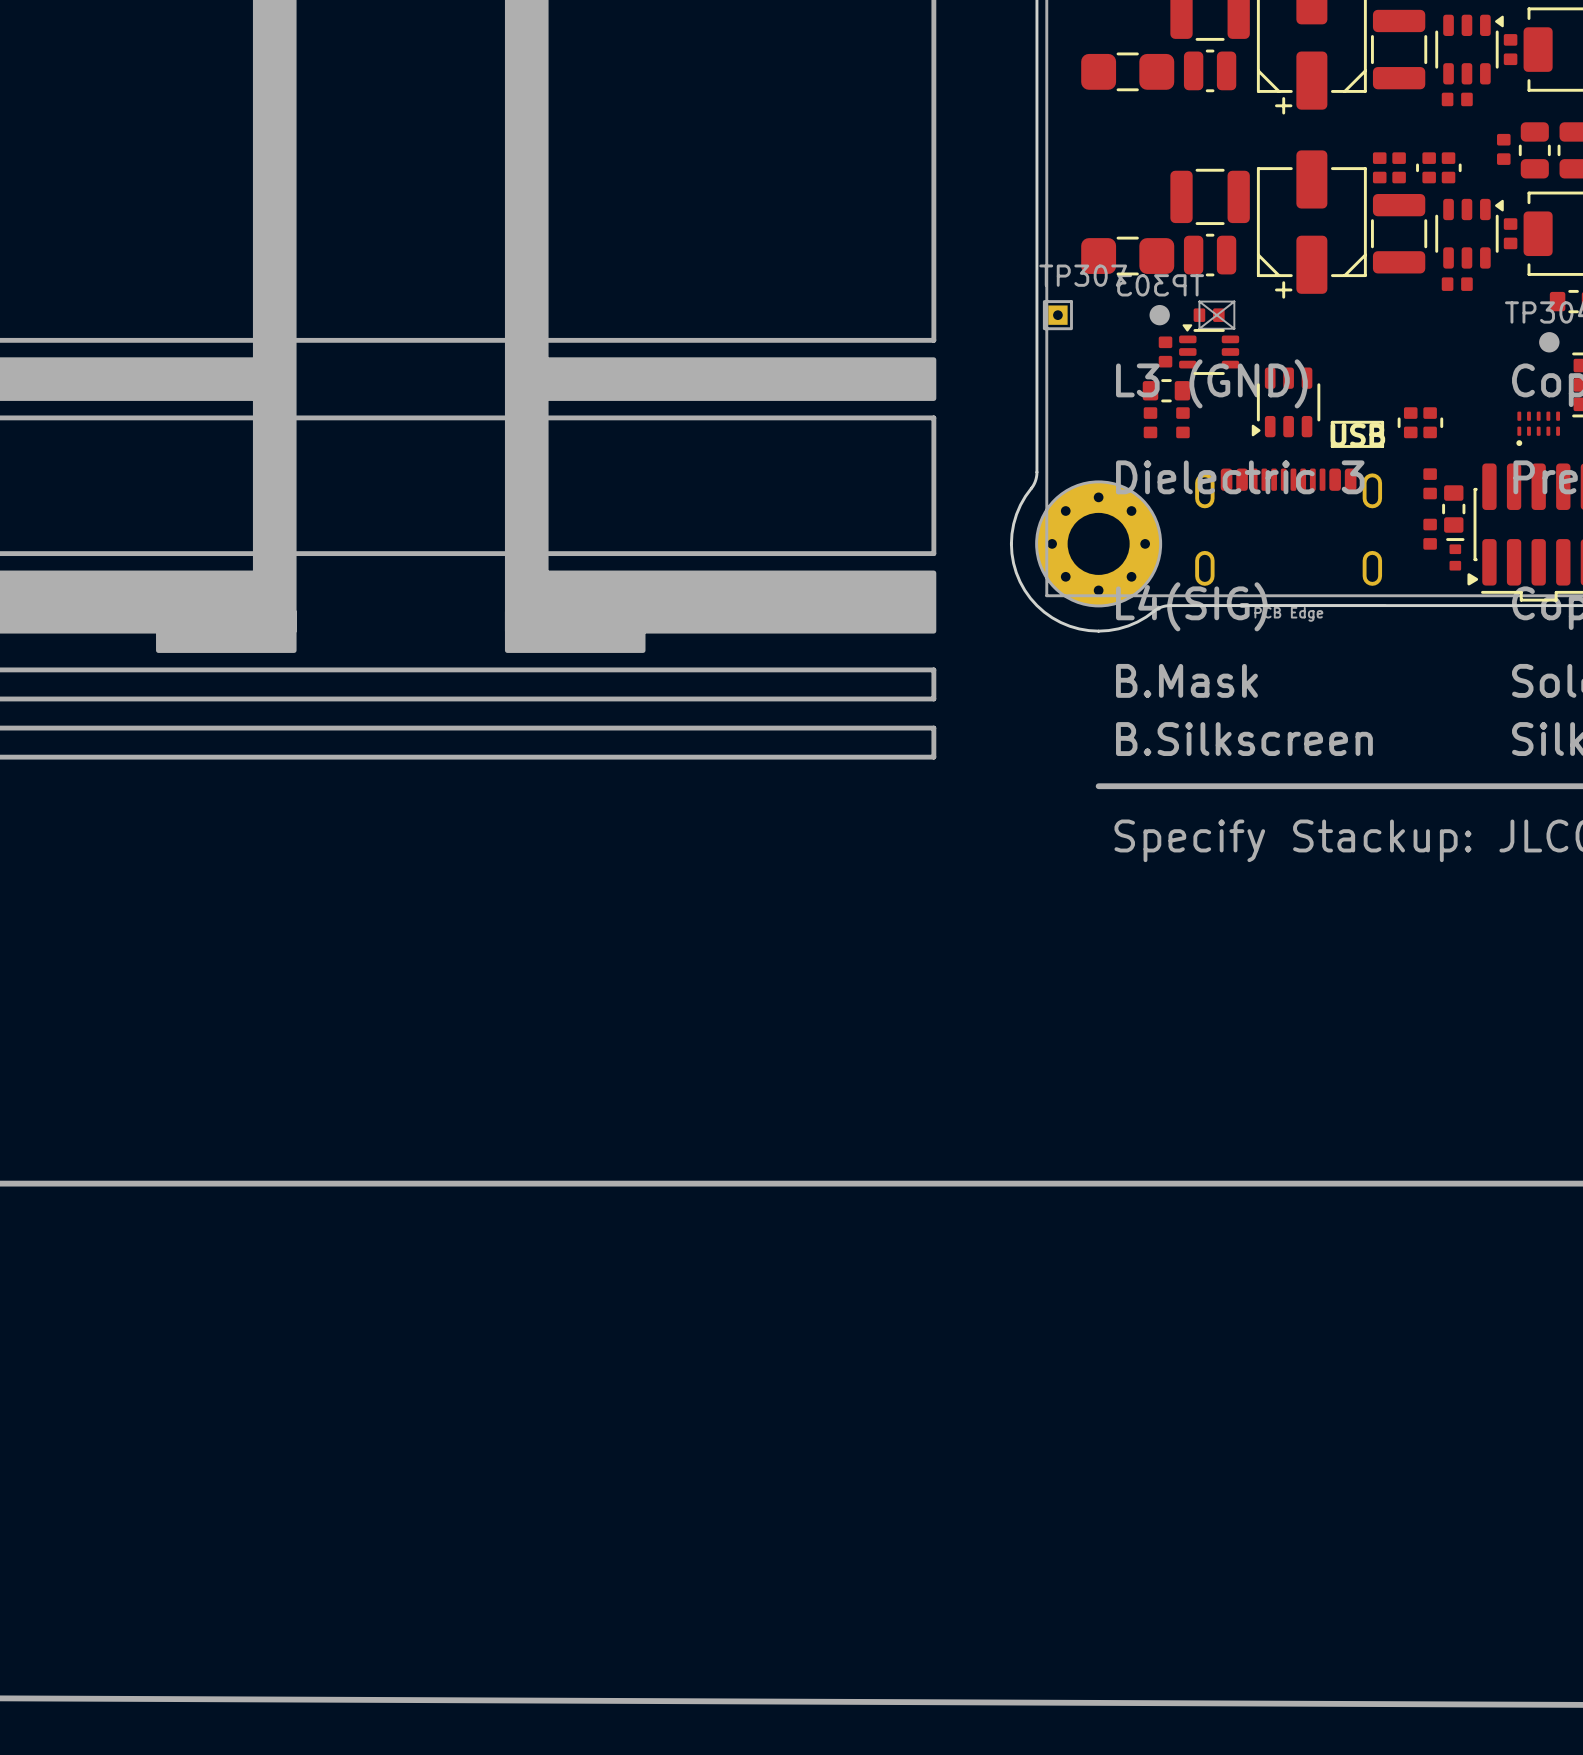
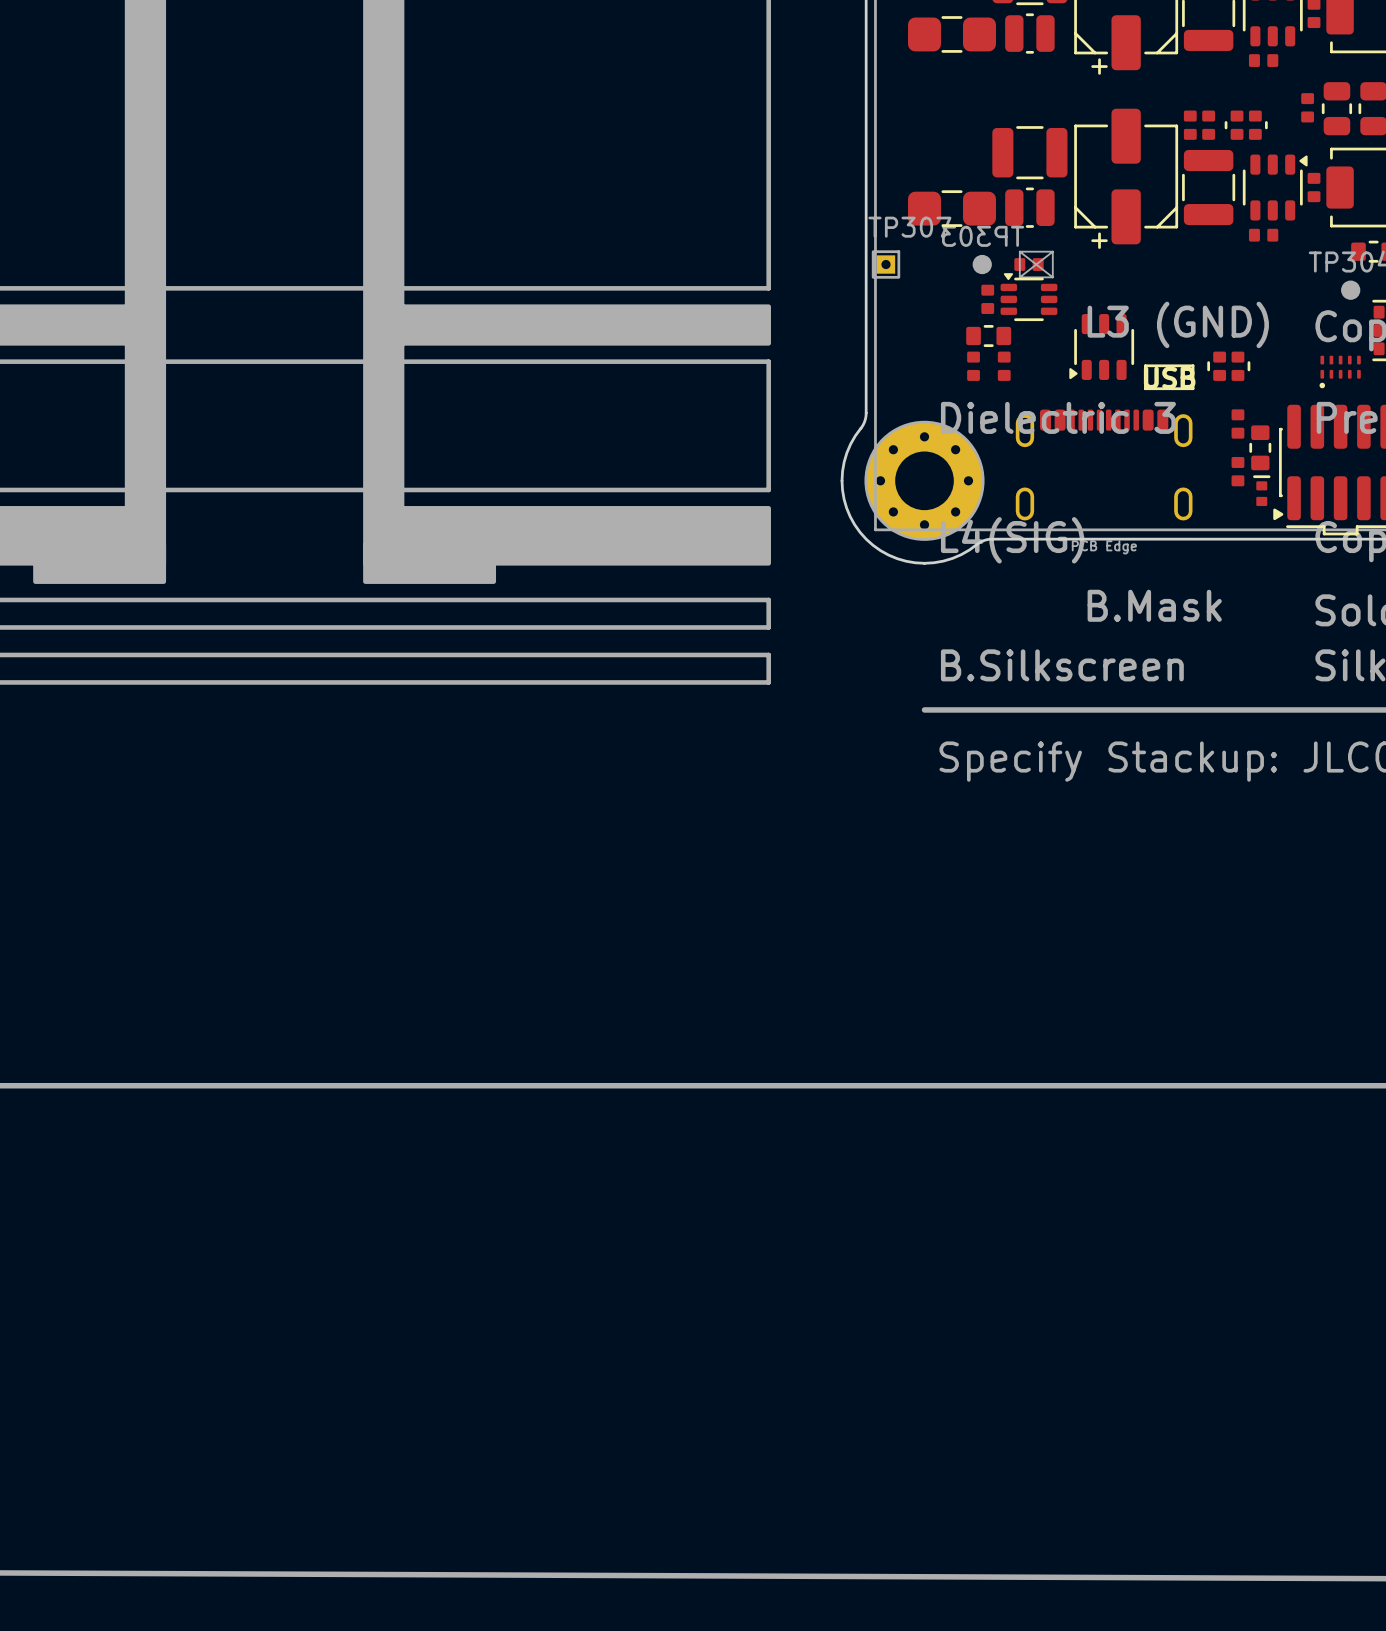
text position: L3 (GND) (1211, 383) -> L3 (GND) (1178, 324)
text position: B.Mask (1186, 680) -> B.Mask (1154, 605)

